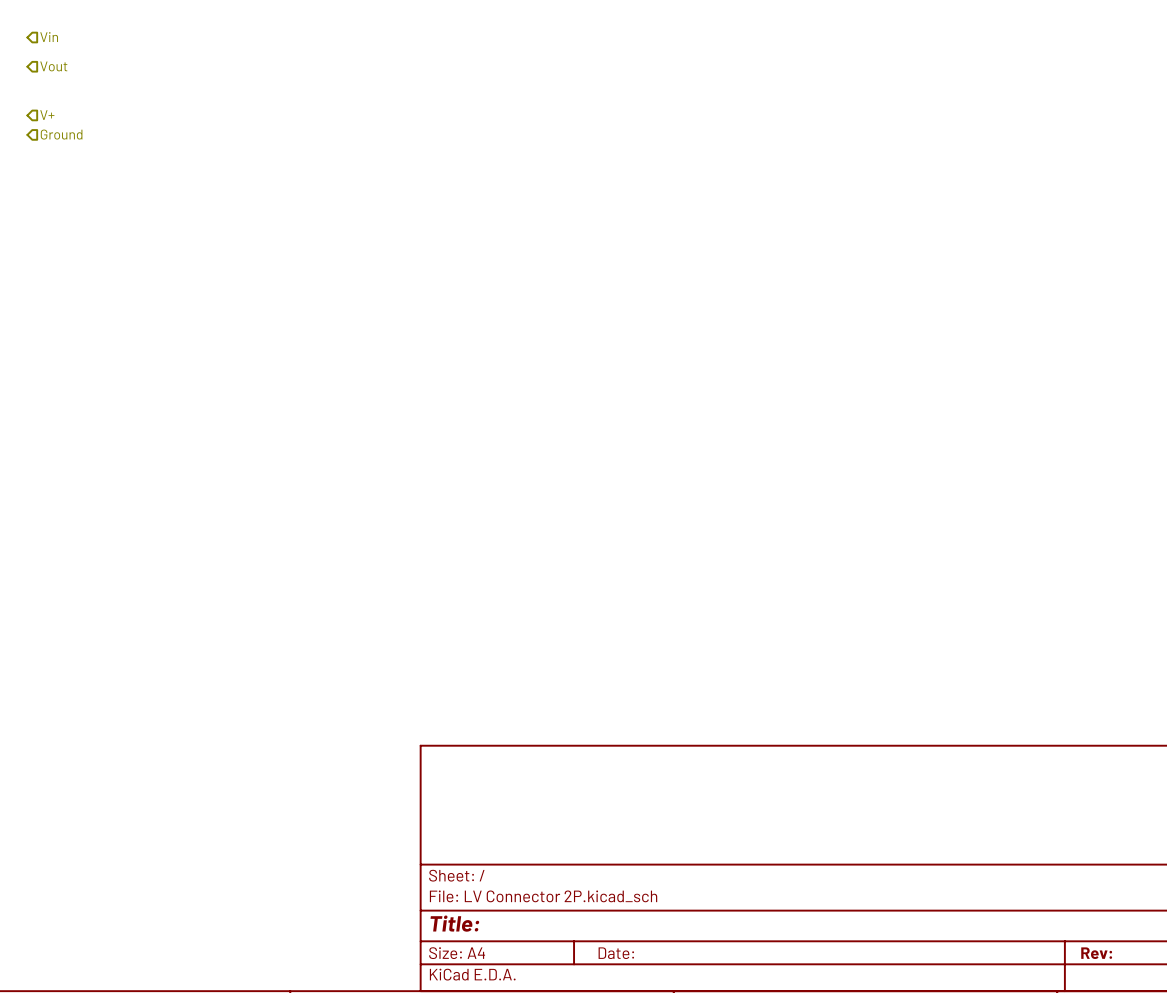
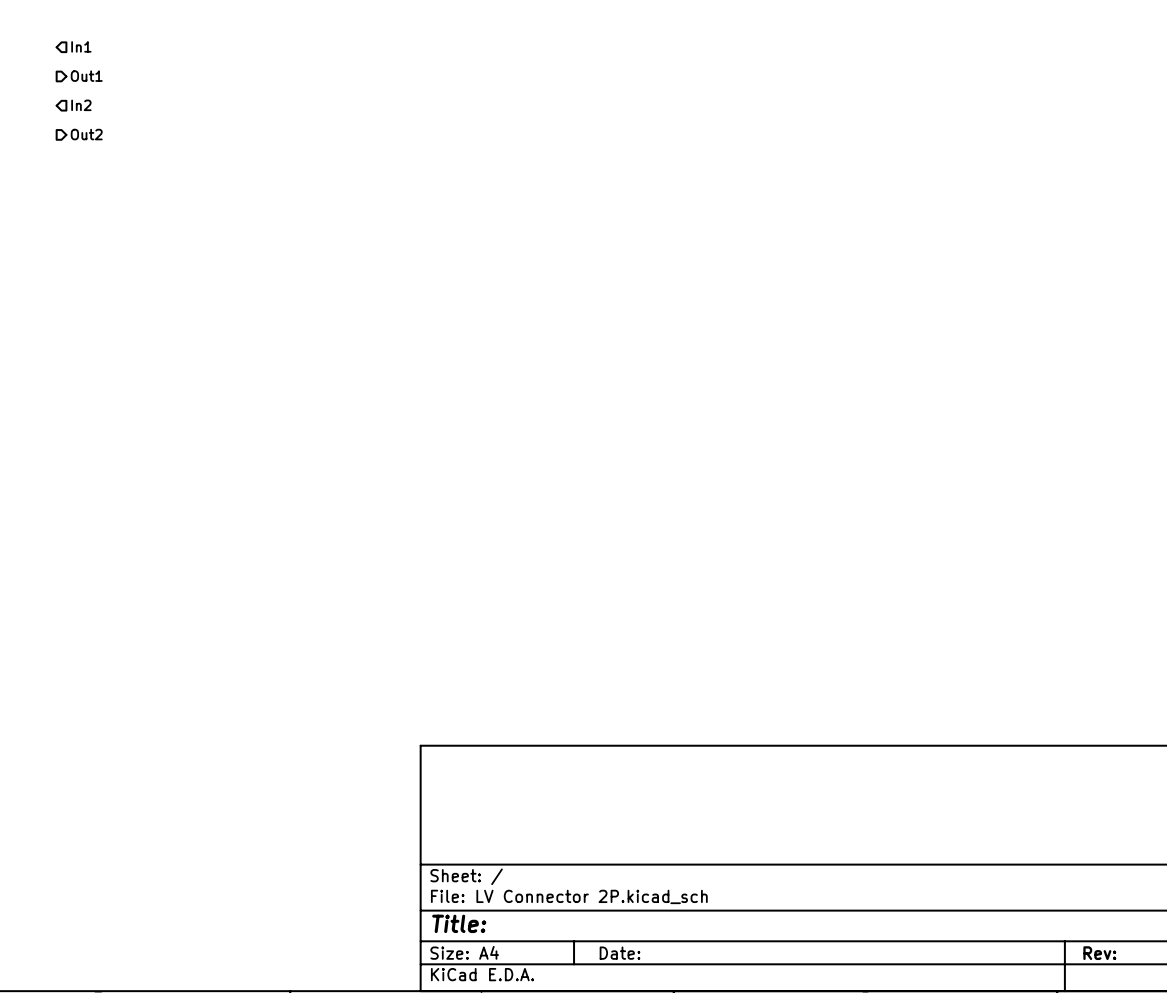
hierarchical label: Vin (49, 37) -> none
hierarchical label: none -> In1 (81, 46)
hierarchical label: Vout (53, 66) -> none
hierarchical label: none -> Out1 (86, 76)
hierarchical label: none -> In2 (81, 105)
hierarchical label: V+ (47, 115) -> none
hierarchical label: Ground (61, 134) -> none
hierarchical label: none -> Out2 (86, 134)

